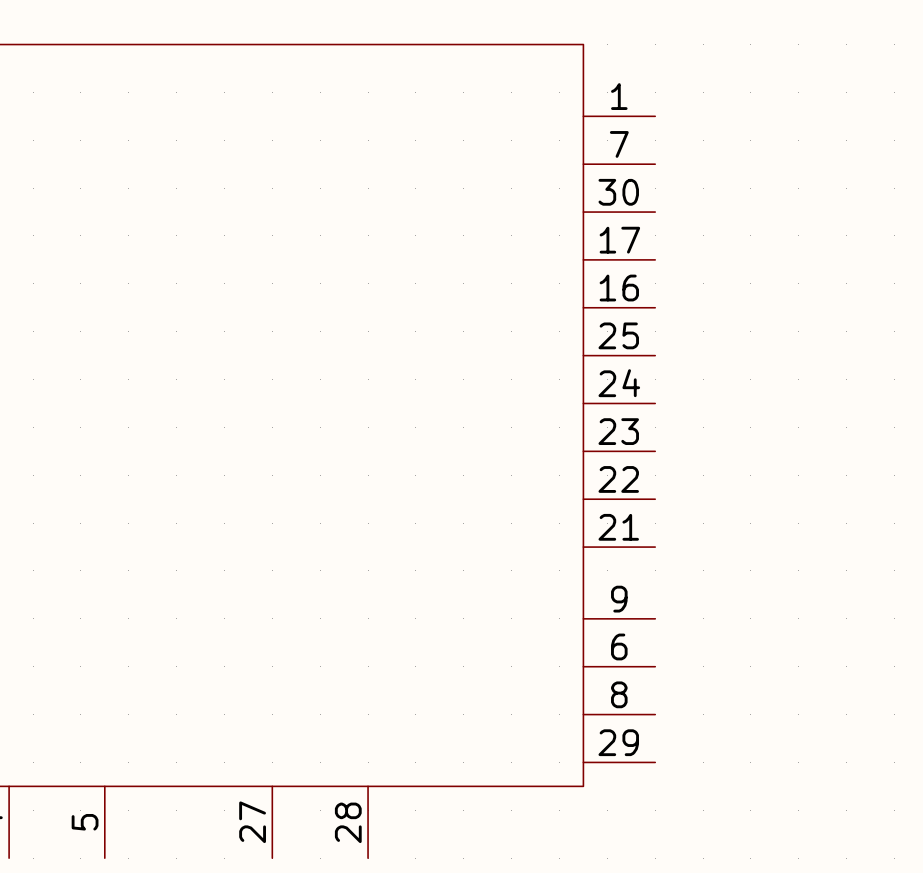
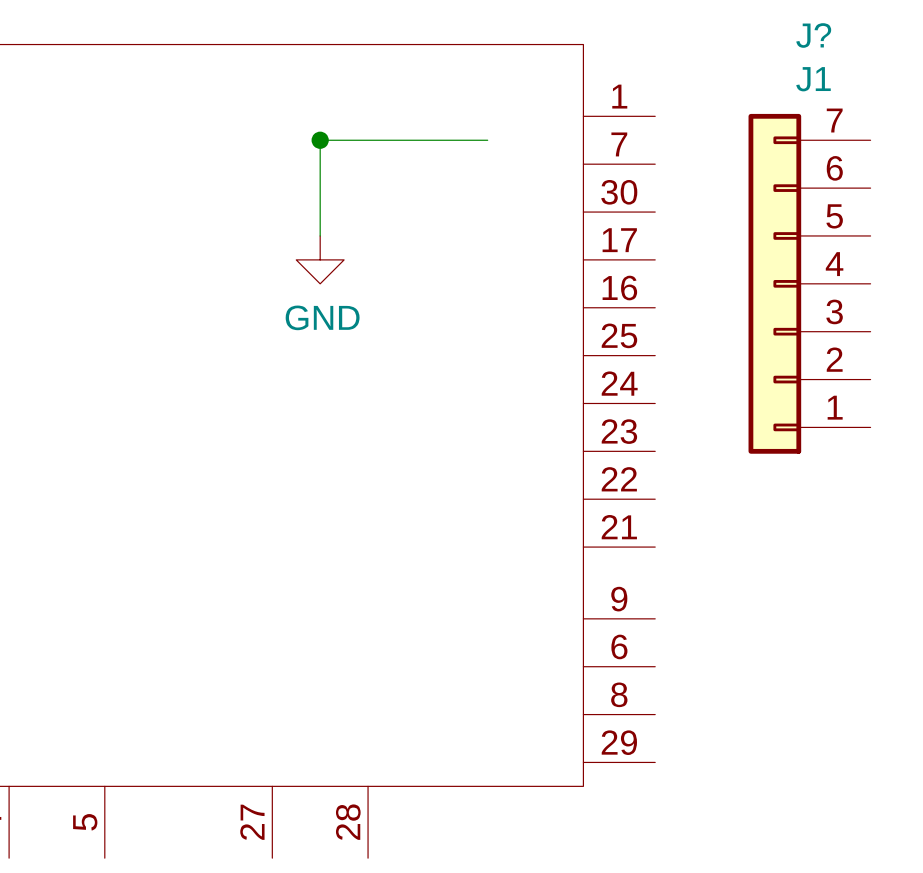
junction: none -> (320, 140)
wire: none -> (487, 140) (320, 140) (320, 235)
power symbol: none -> GND (320, 259)
J?: none -> J1 (809, 283)

